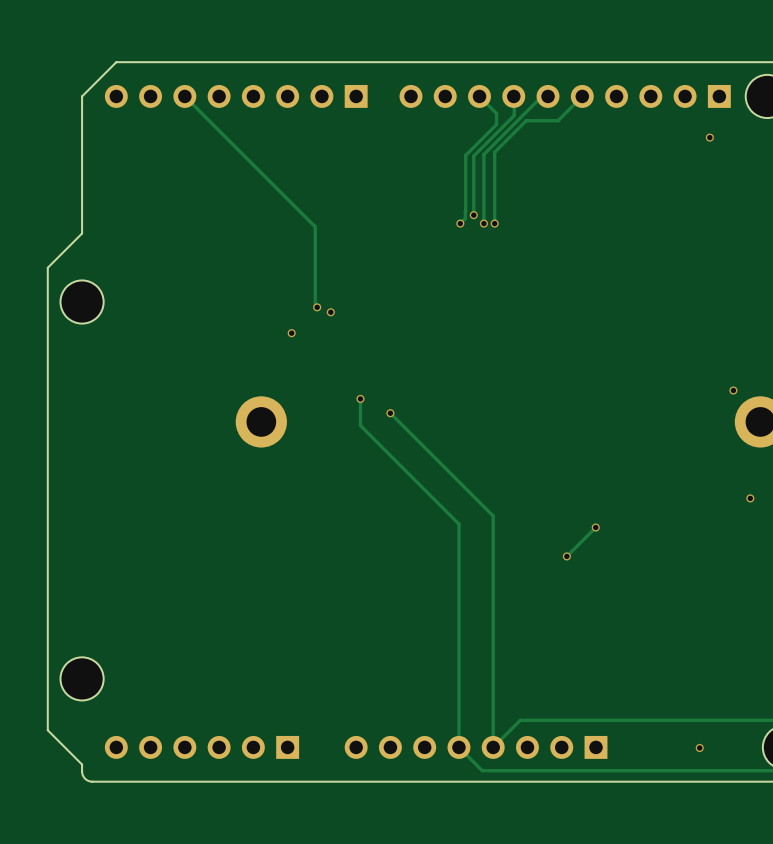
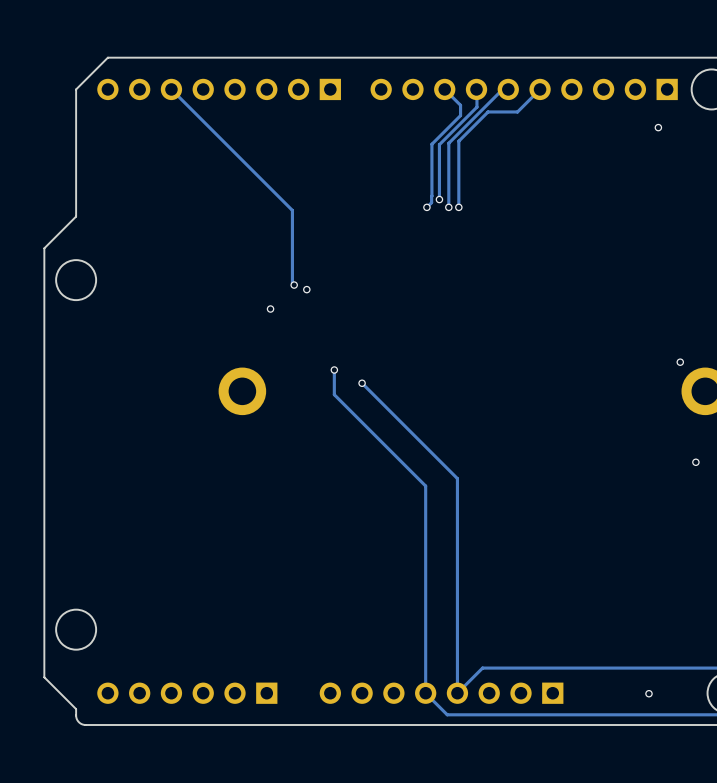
track: (595, 527) (566, 556) -> none
via: (595, 527) -> none
via: (566, 556) -> none

